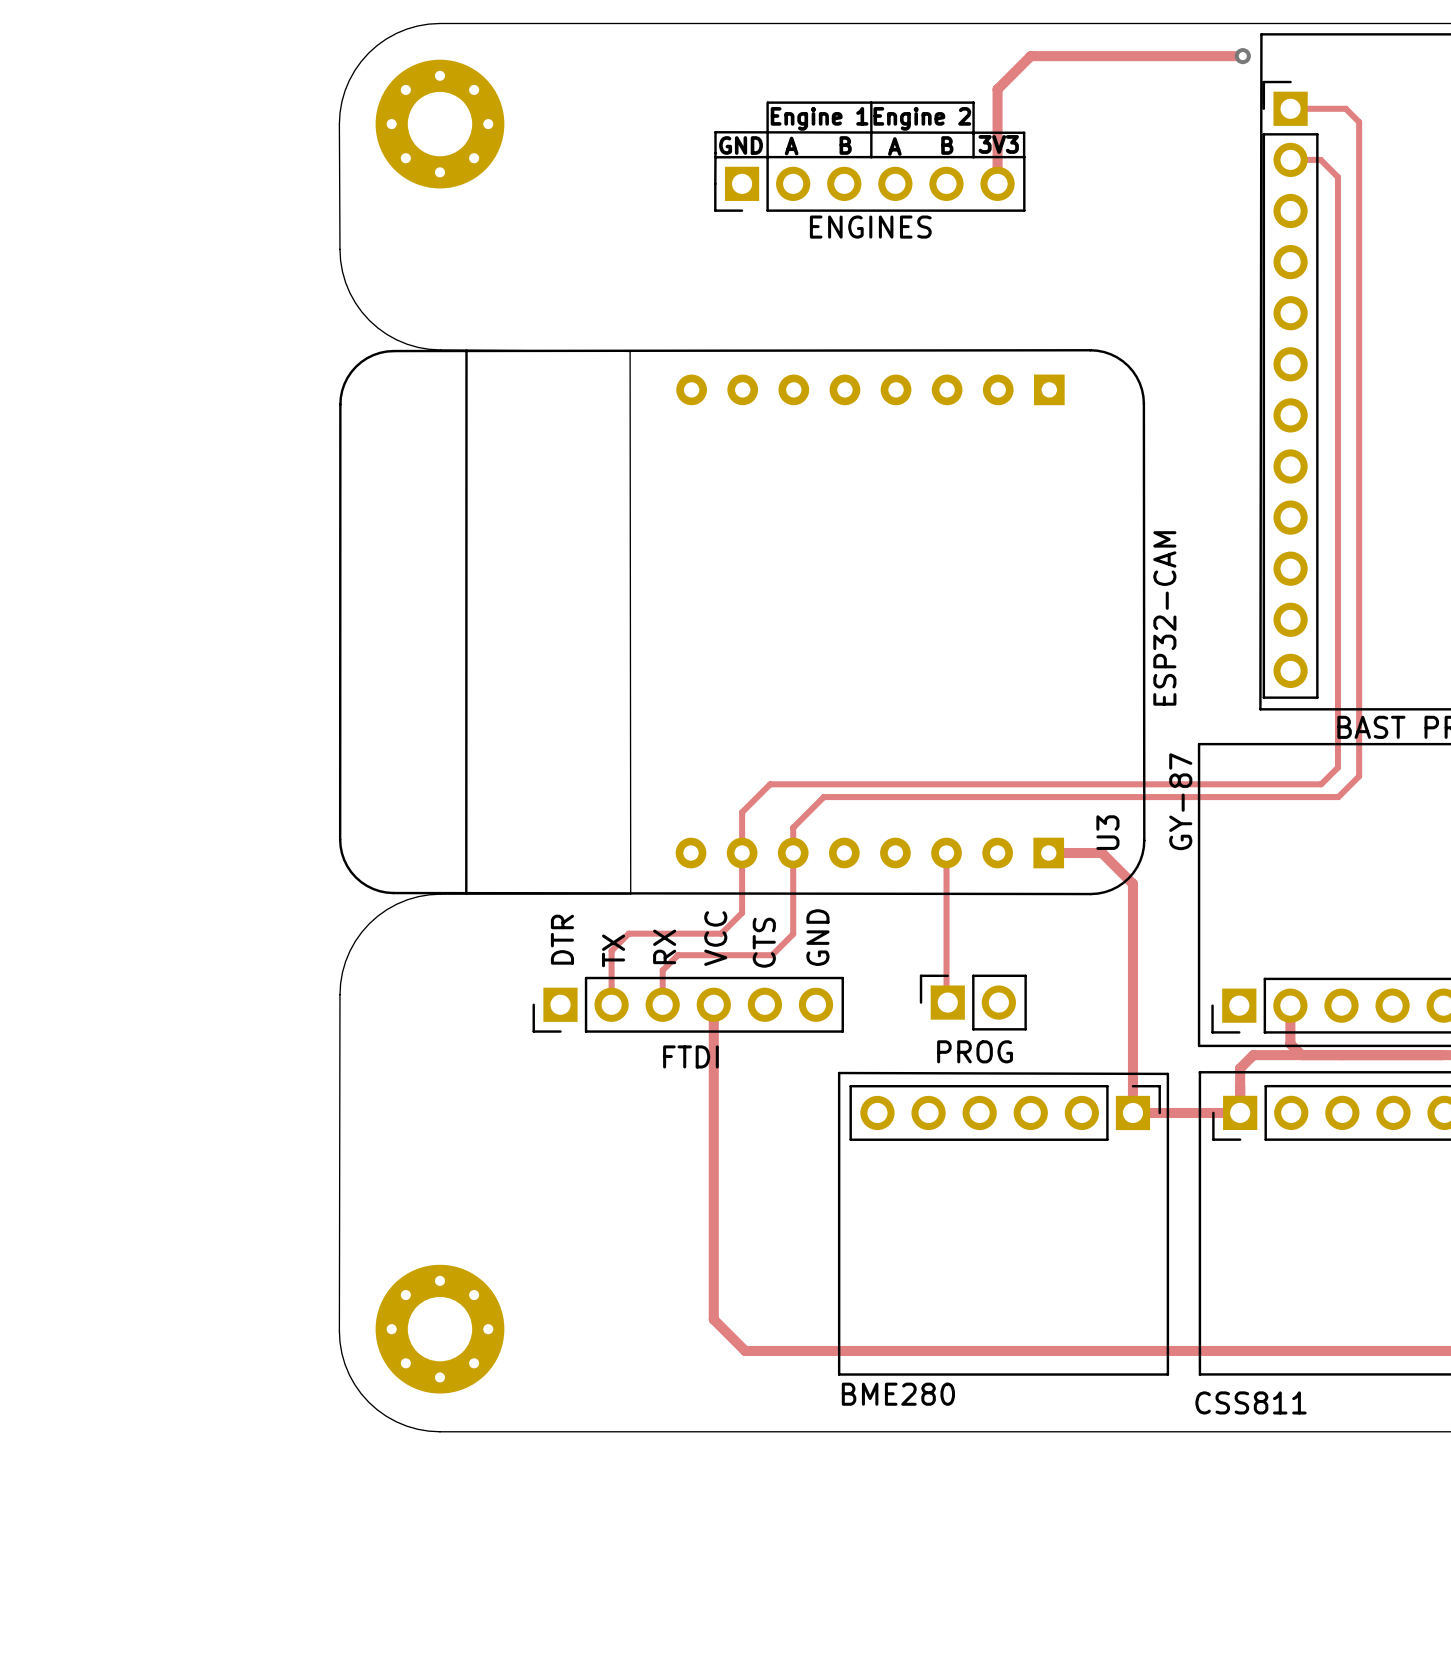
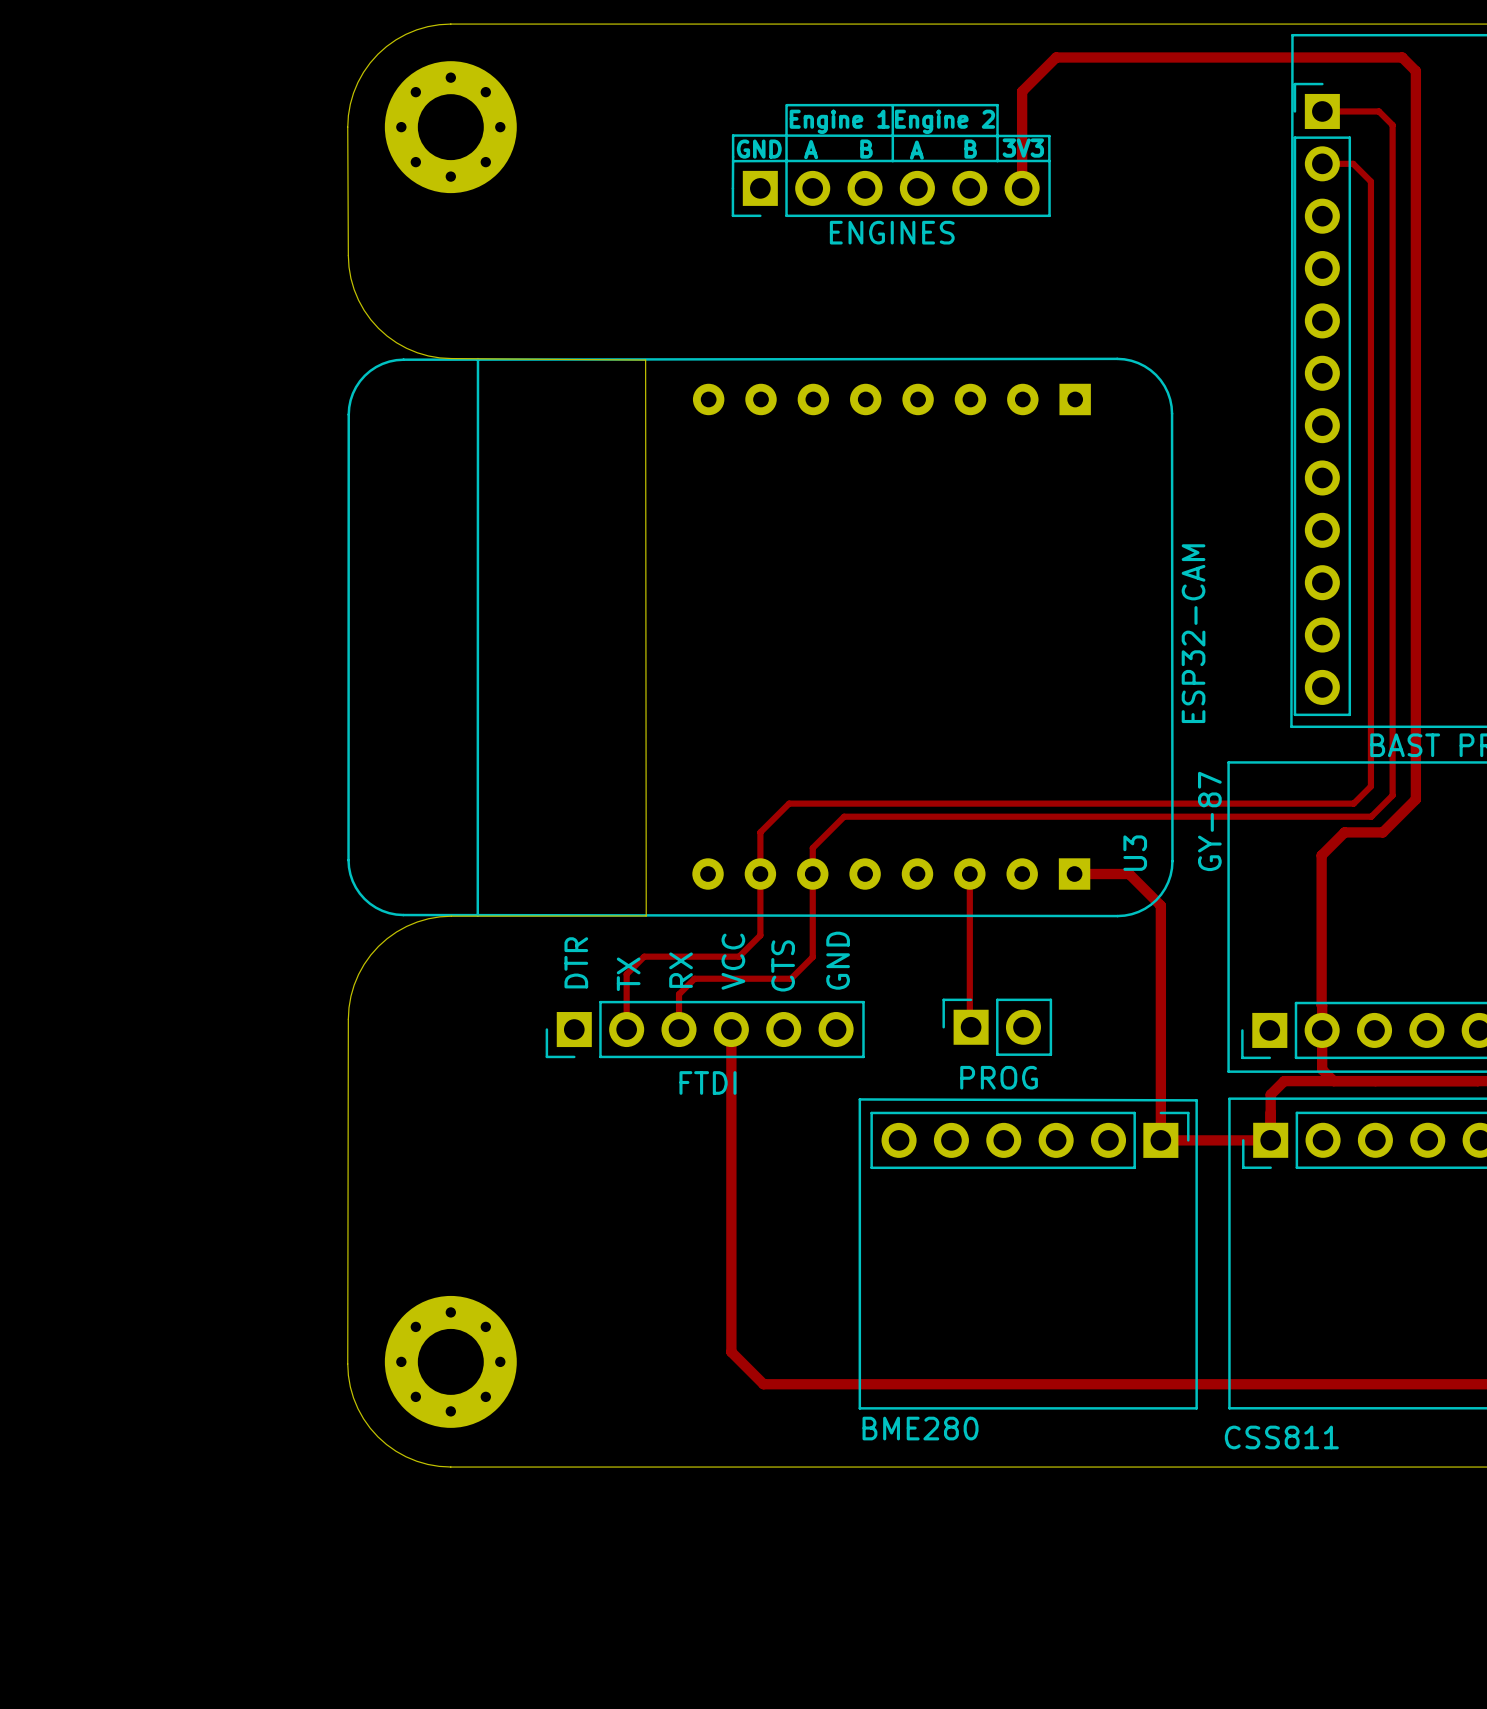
track: none -> (1273, 57) (1402, 57) (1415, 71) (1415, 799) (1382, 832) (1344, 832) (1321, 855) (1322, 1030)
via: (1242, 56) -> none

